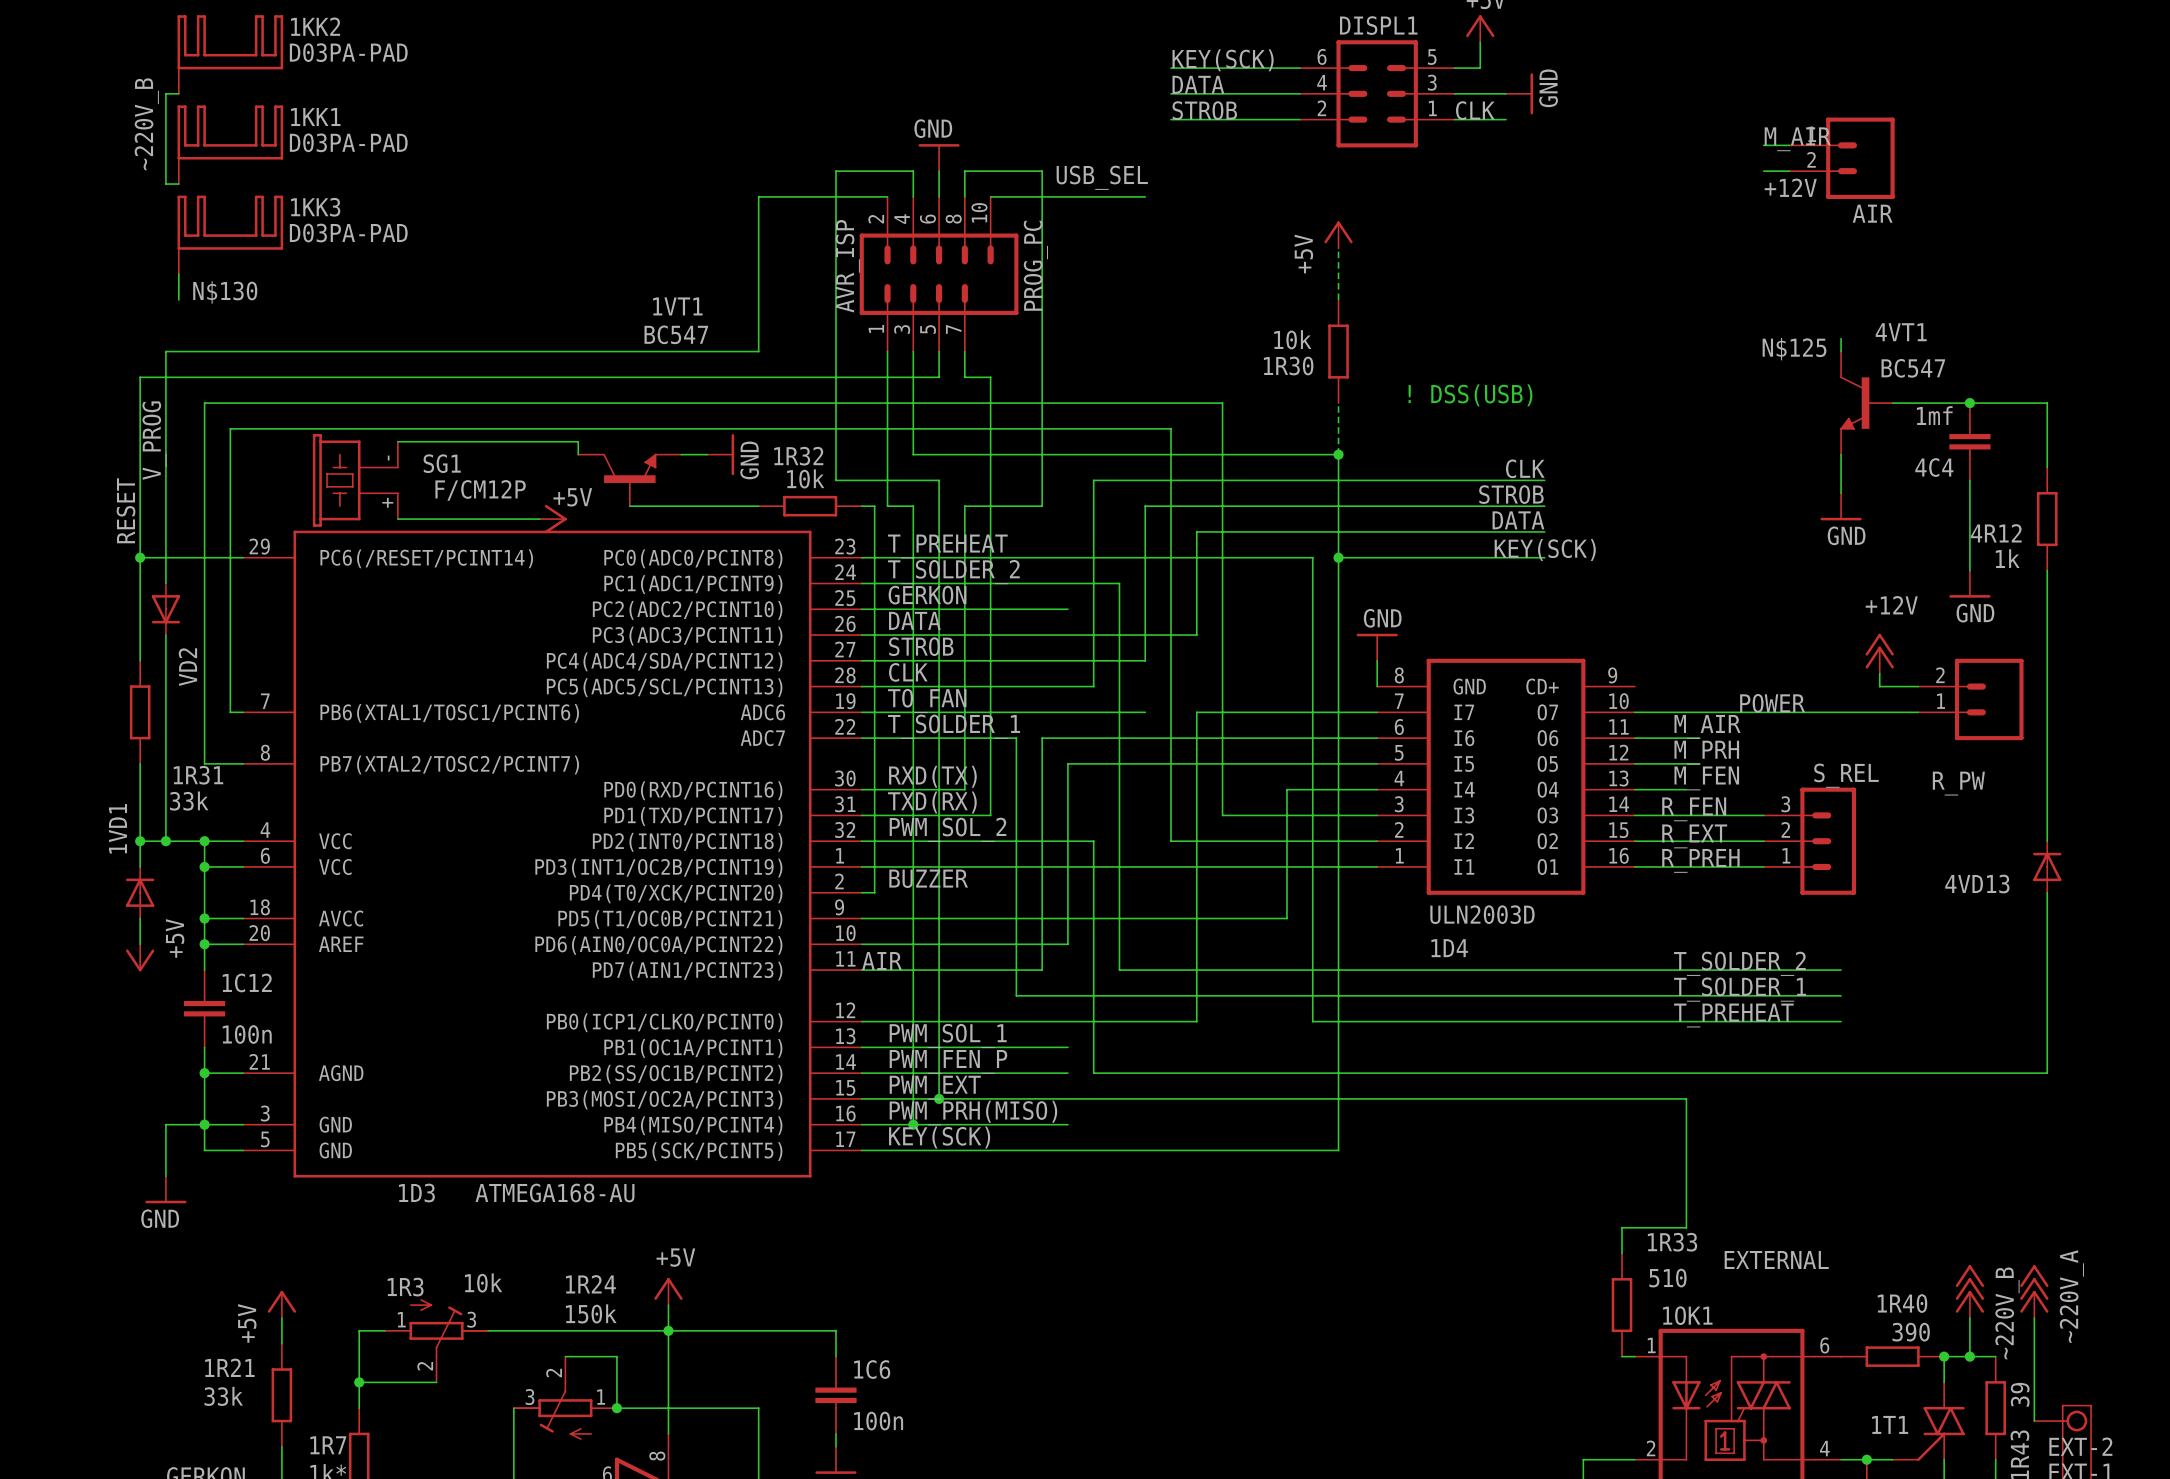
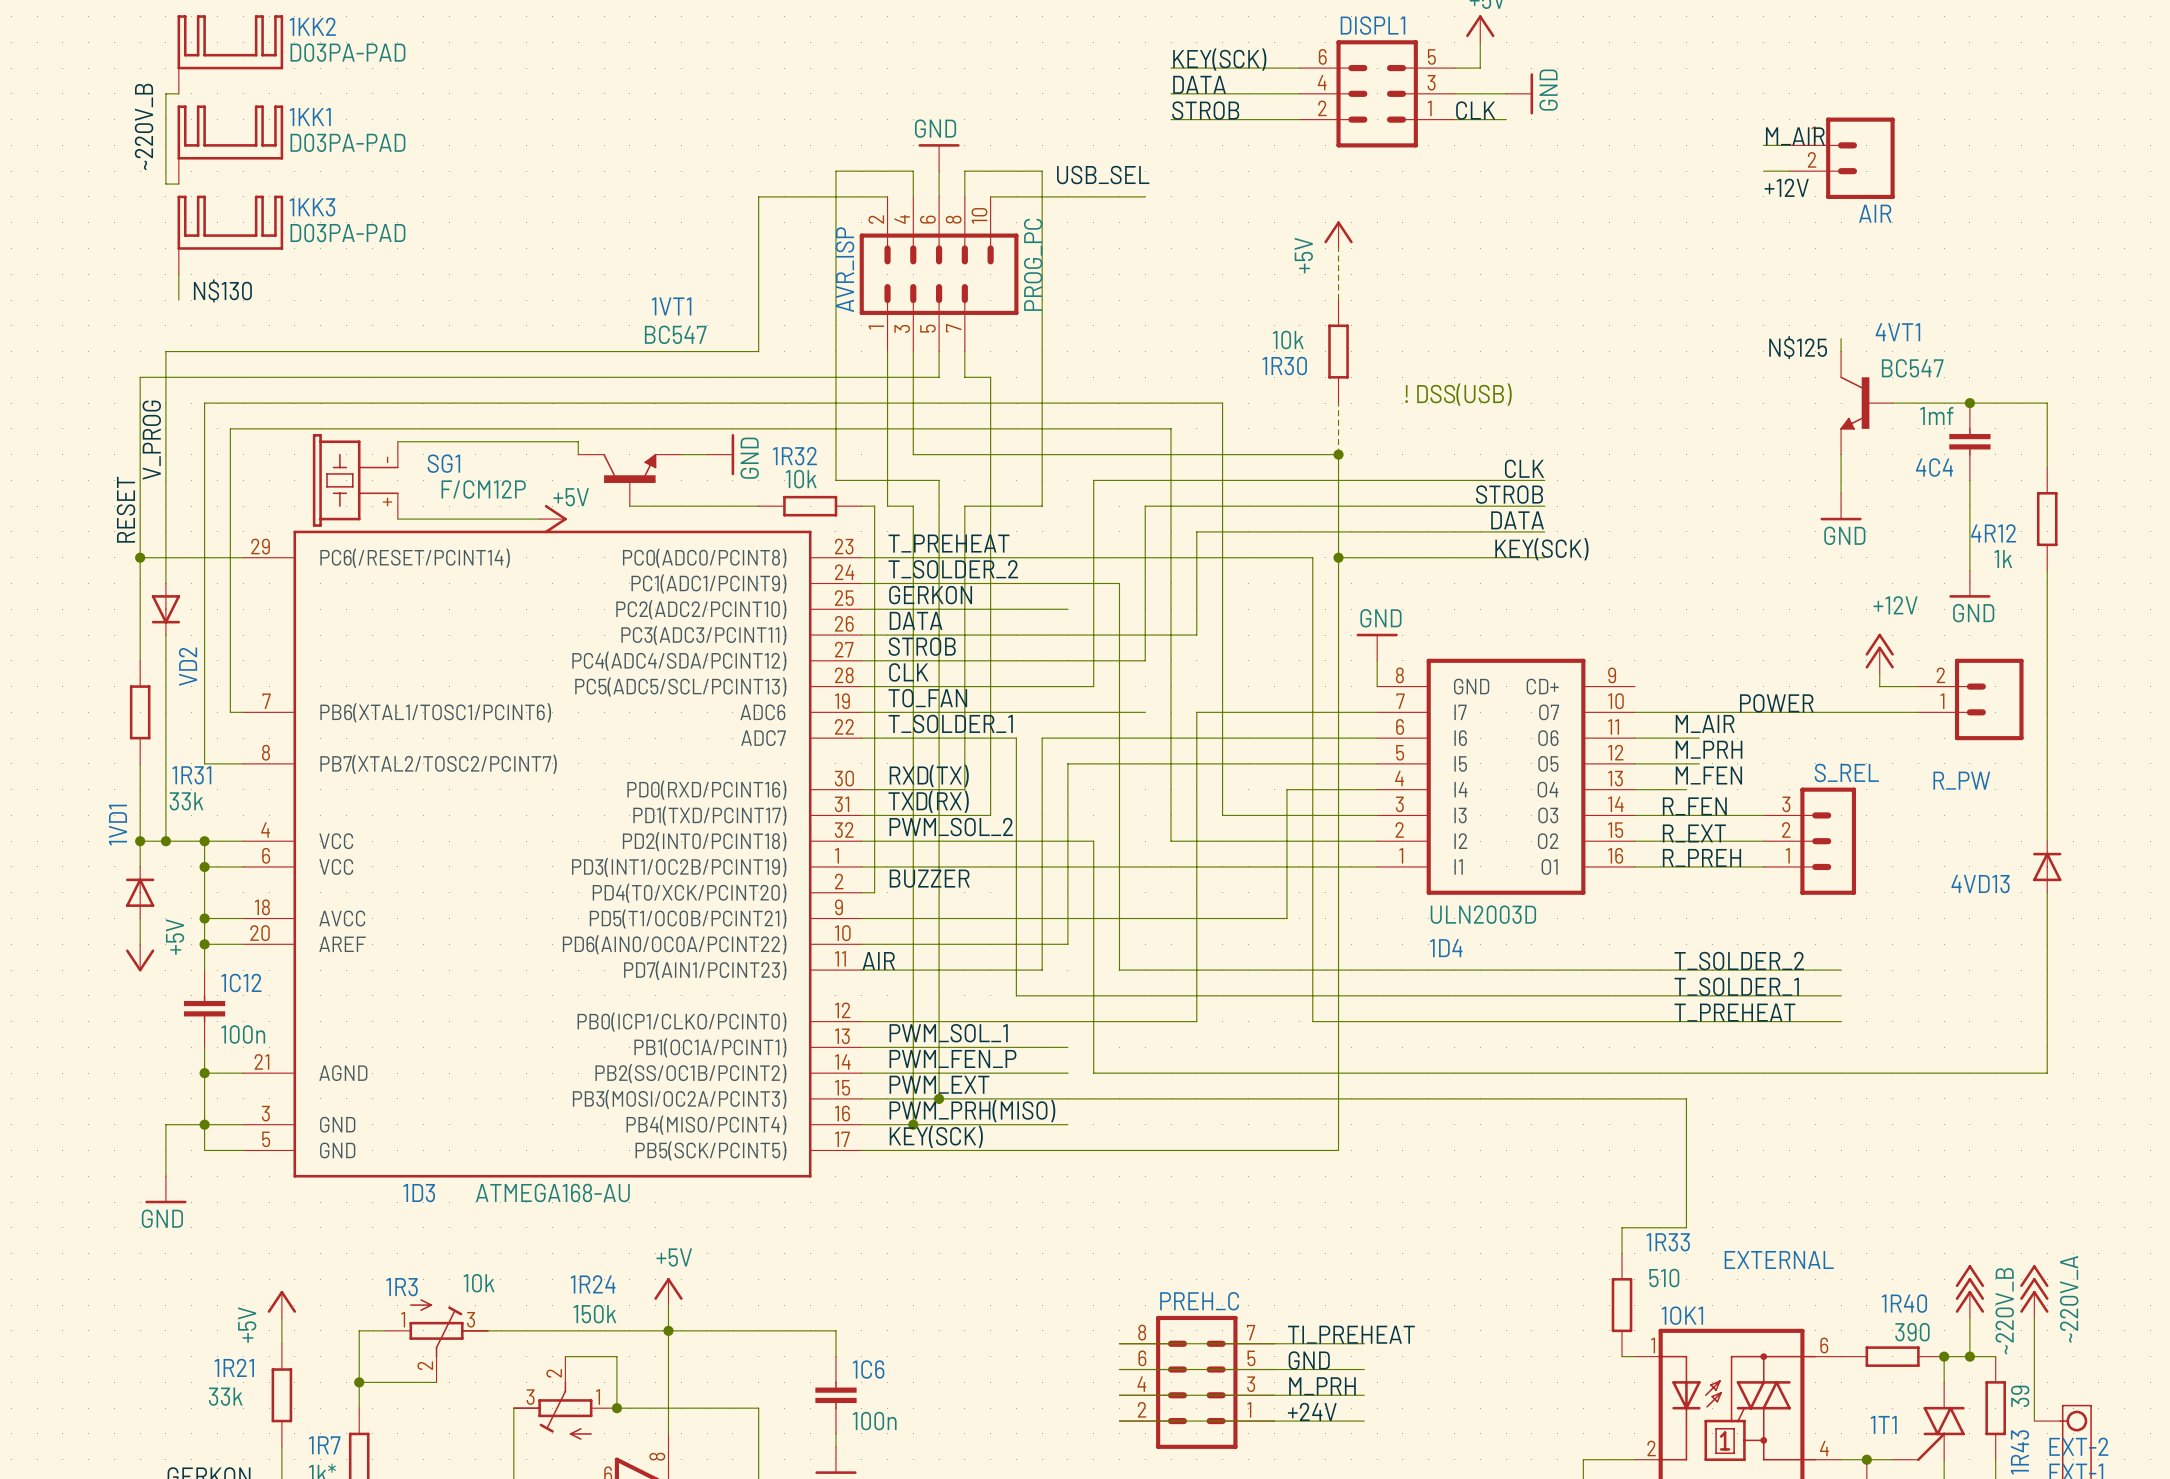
label: none -> TI_PREHEAT (1351, 1334)
wire: none -> (1119, 1343) (1364, 1343)
label: none -> GND (1309, 1360)
wire: none -> (1119, 1369) (1364, 1369)
PREH_C: none -> (1196, 1382)
label: none -> M_PRH (1322, 1386)
wire: none -> (1119, 1395) (1364, 1395)
label: none -> +24V (1312, 1411)
wire: none -> (1119, 1421) (1364, 1421)

